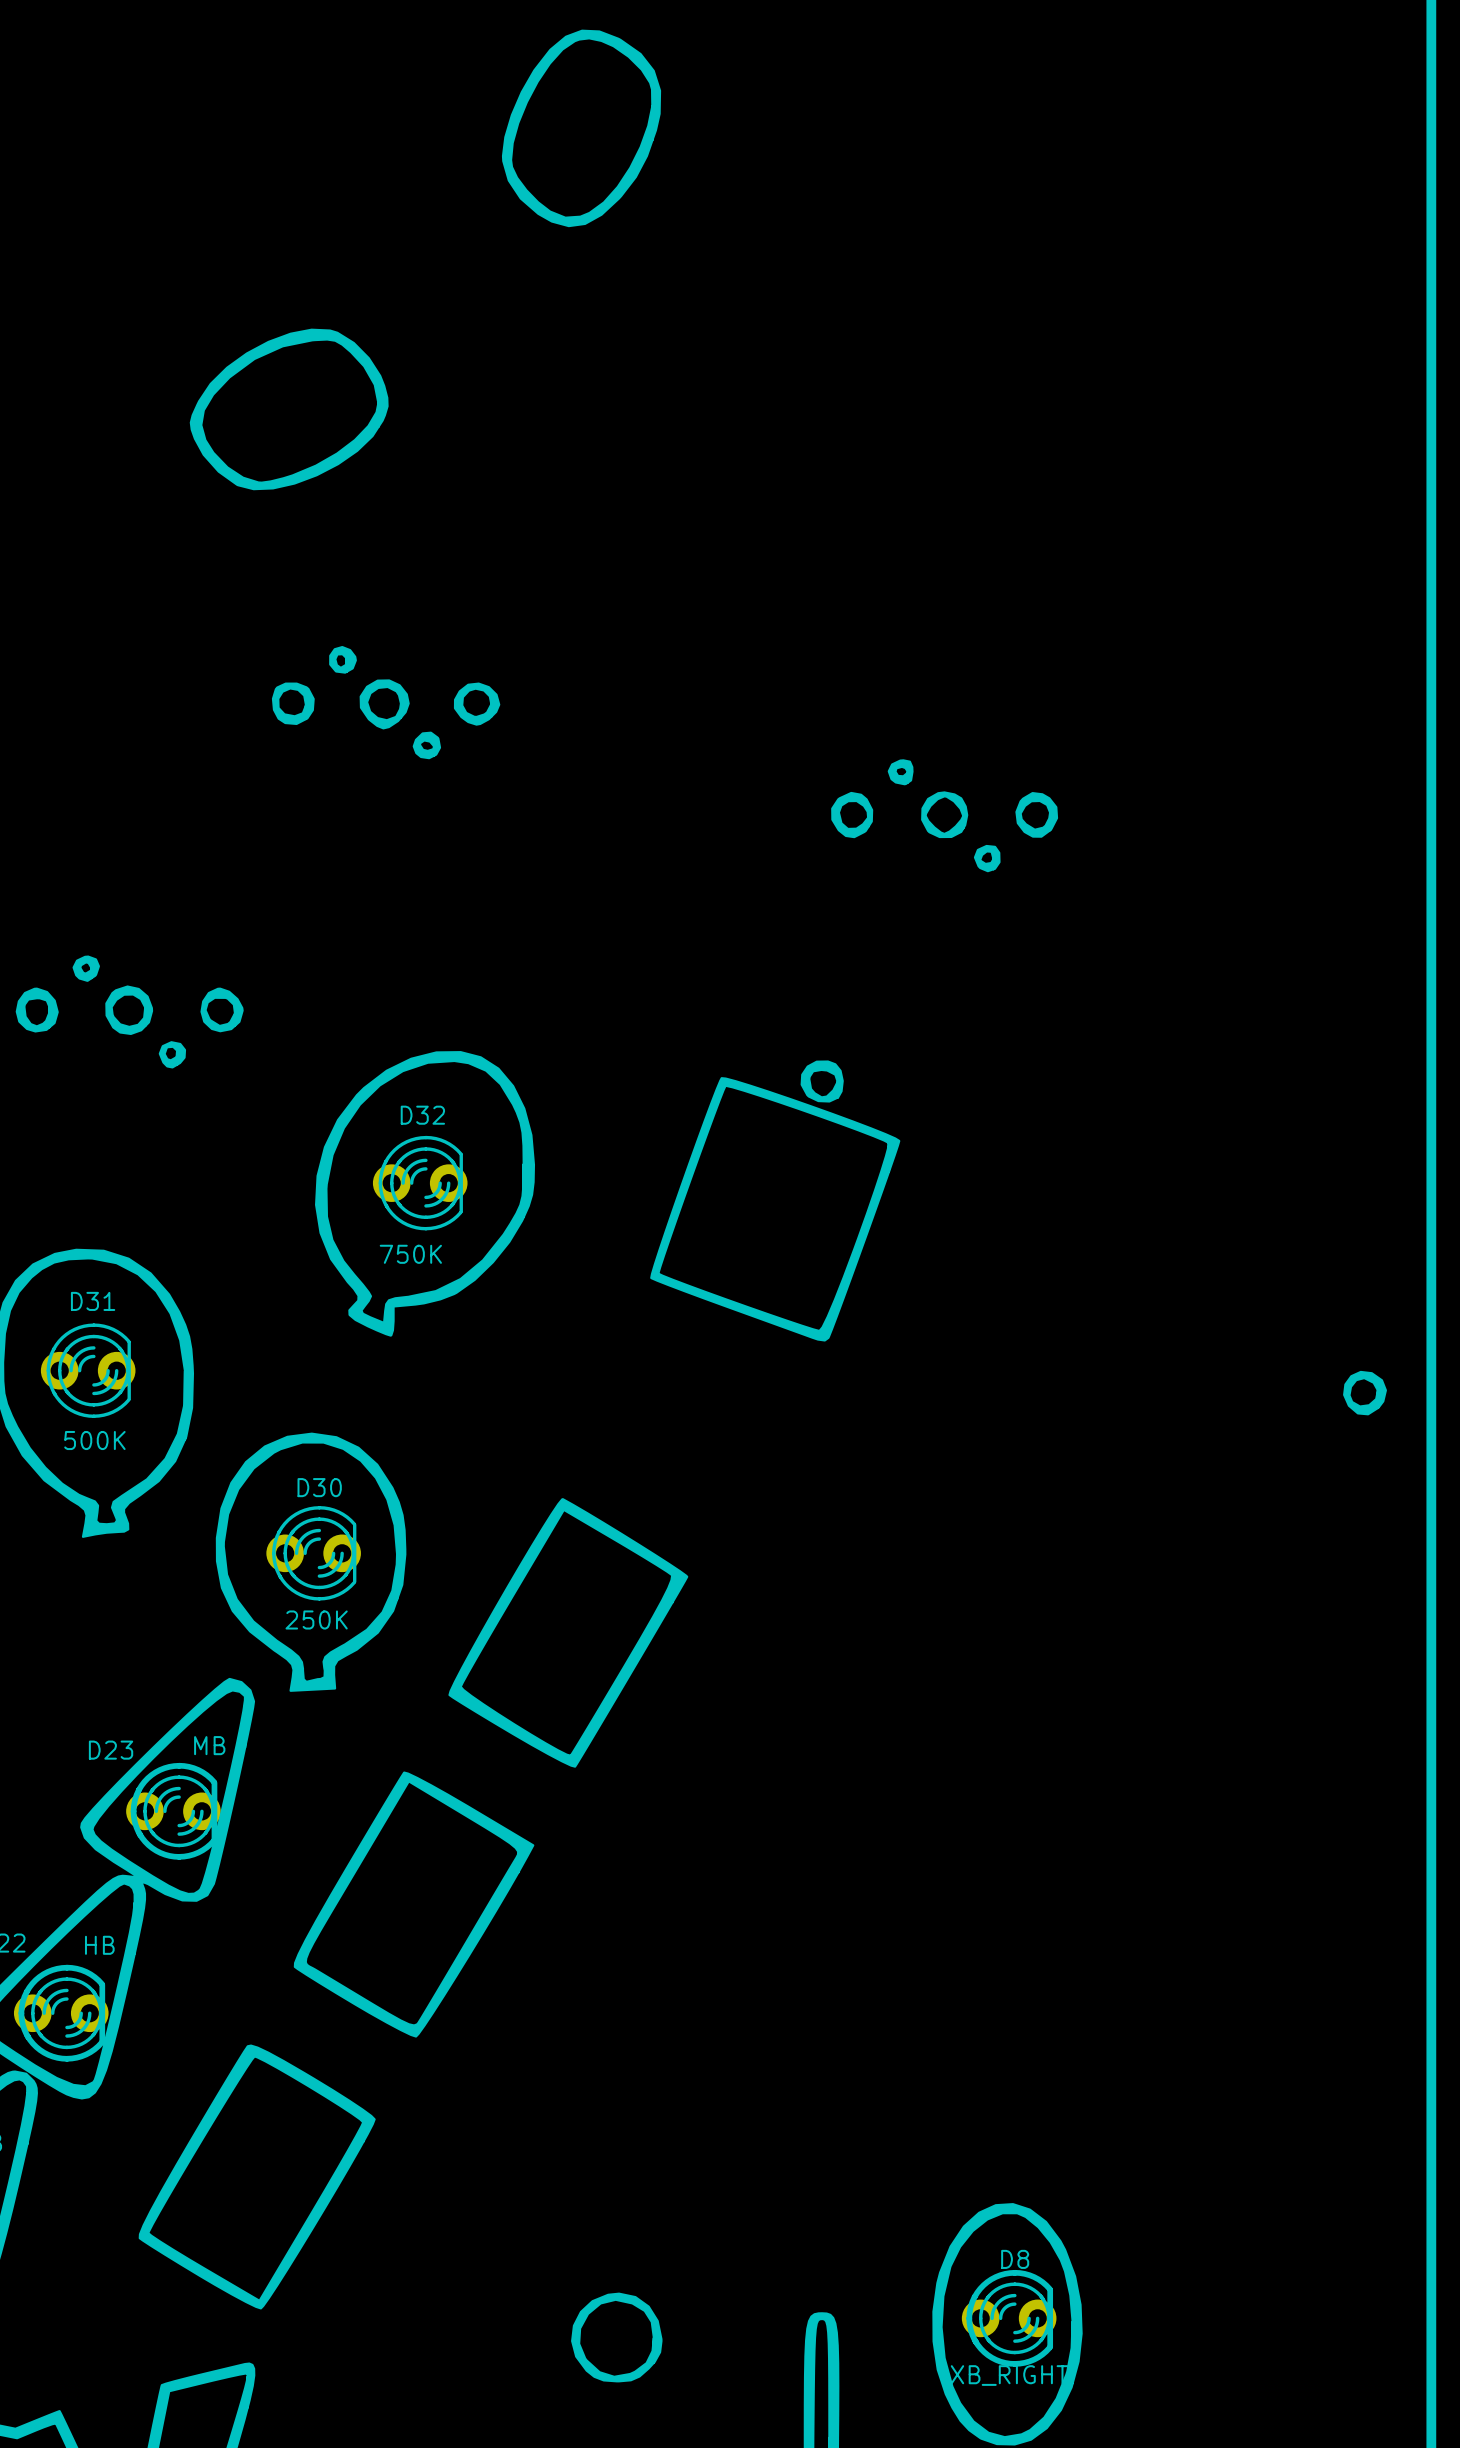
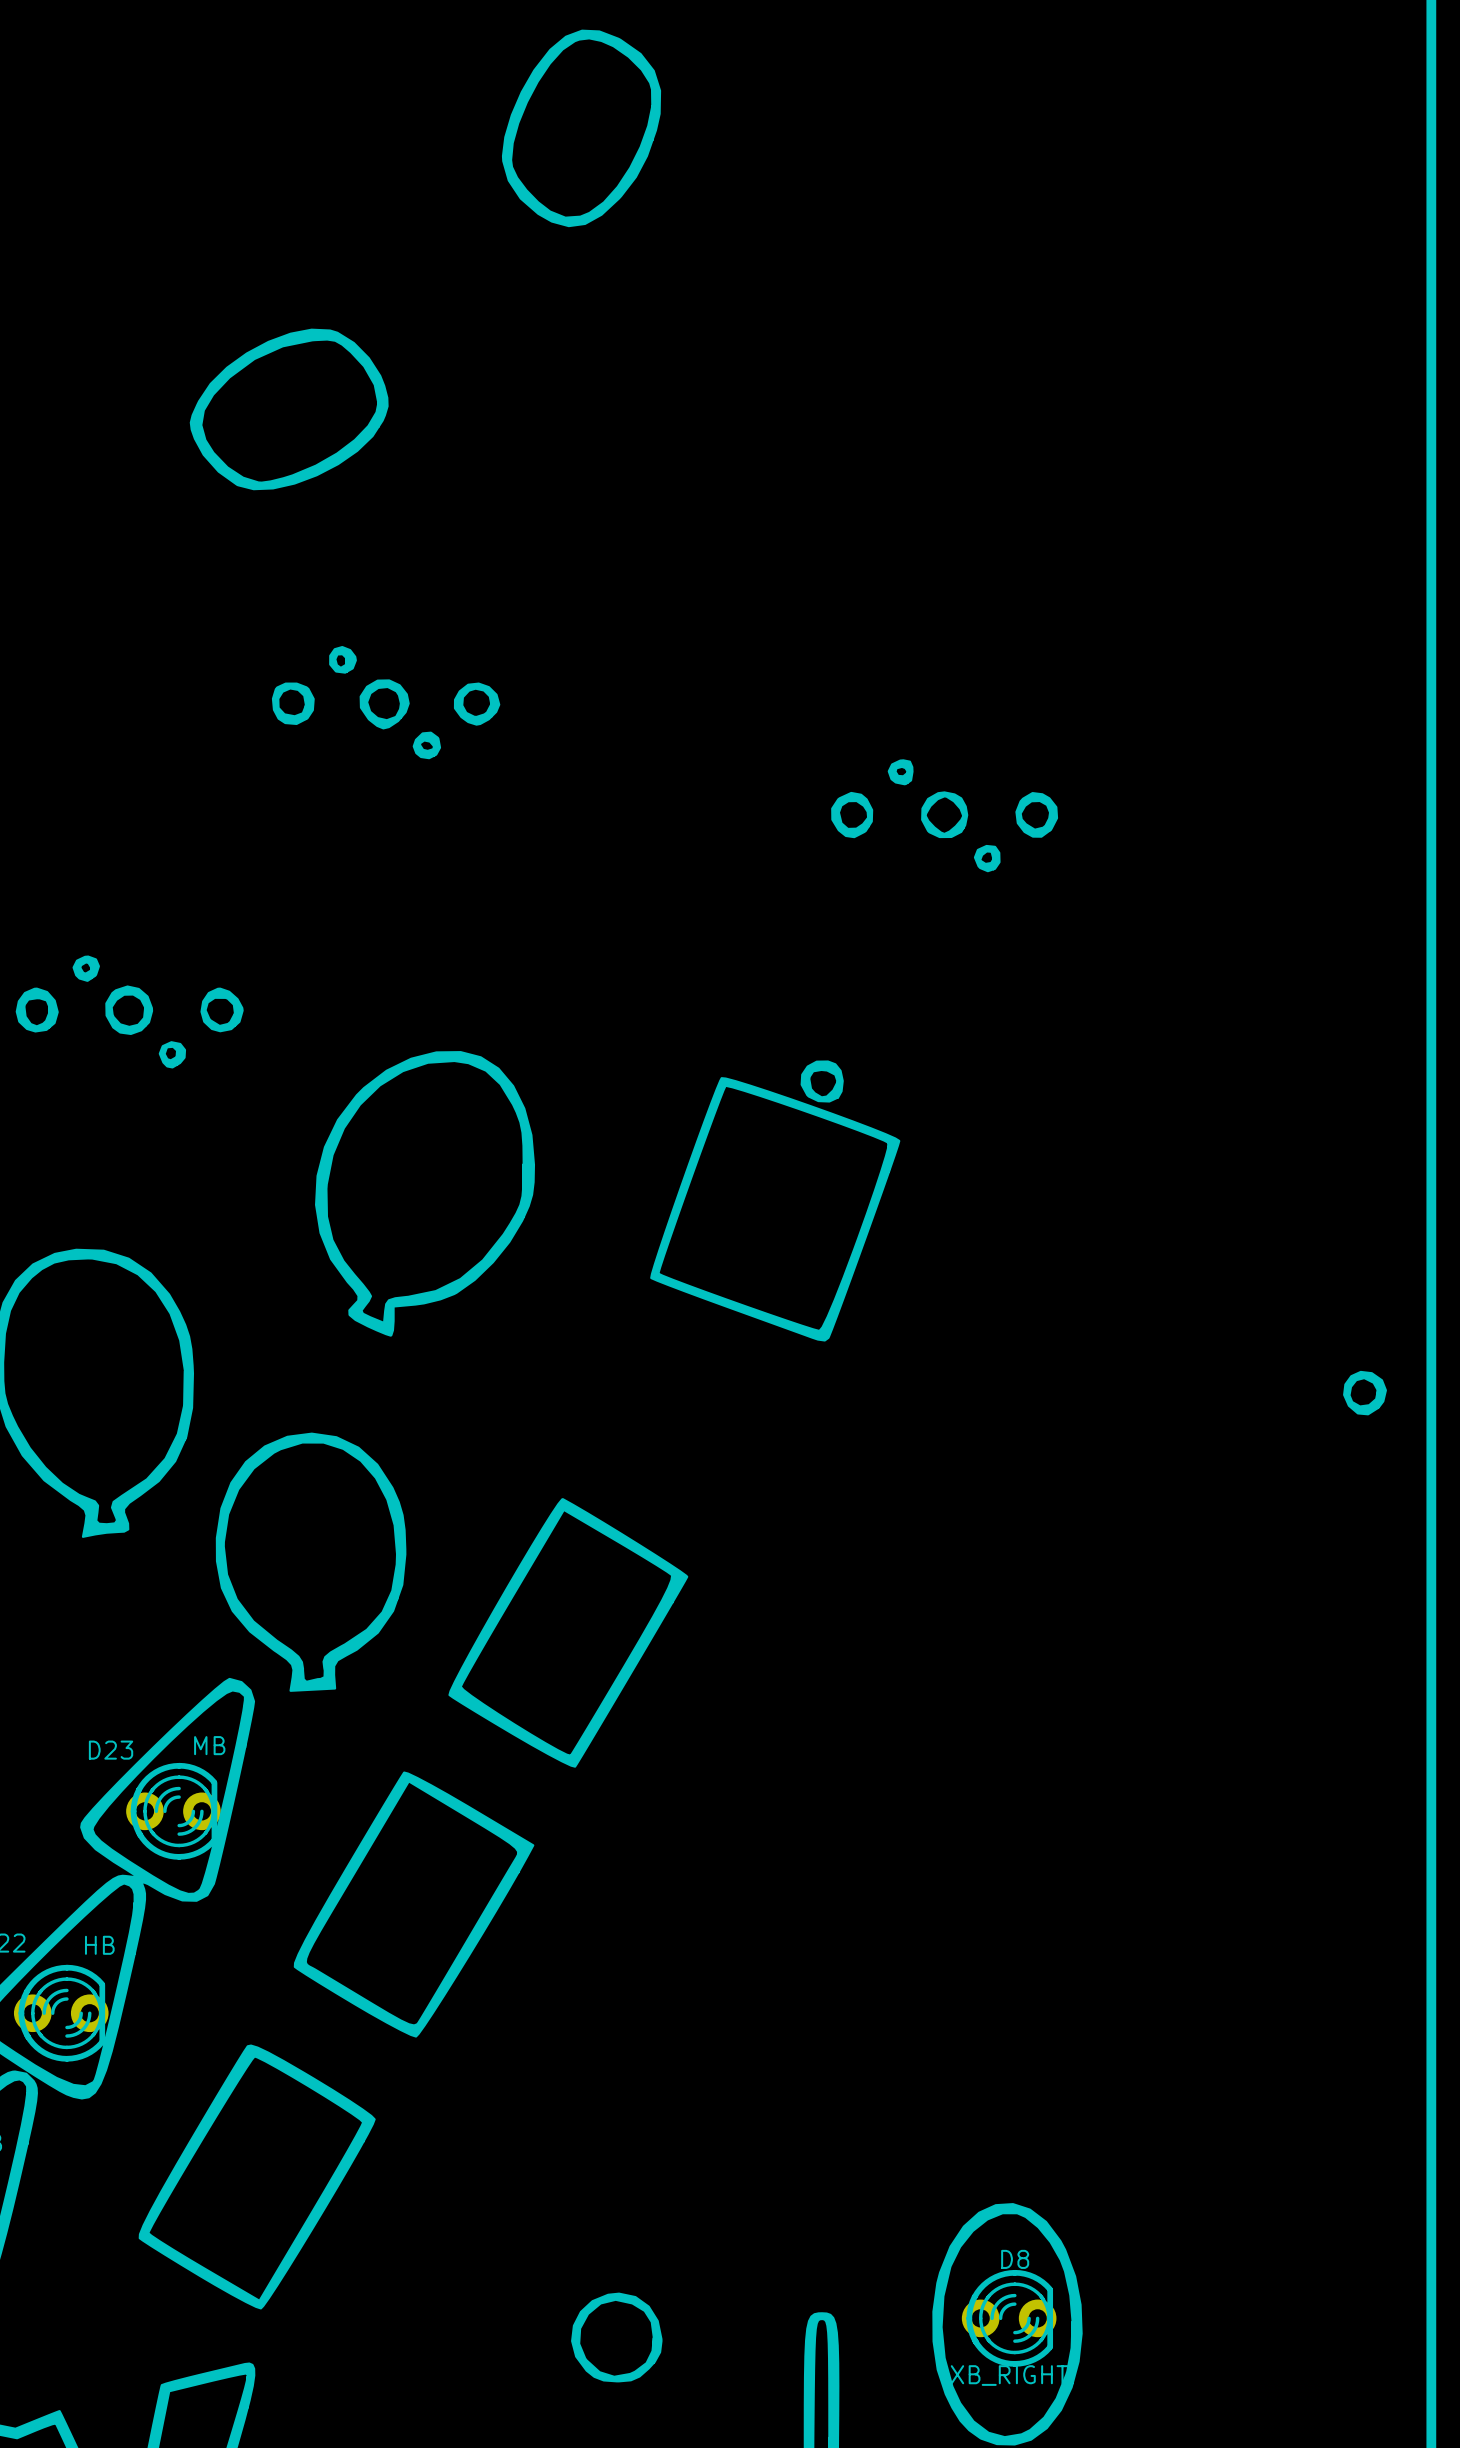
D32: 750K (420, 1183) -> none
D31: 500K (88, 1370) -> none
D30: 250K (313, 1553) -> none

